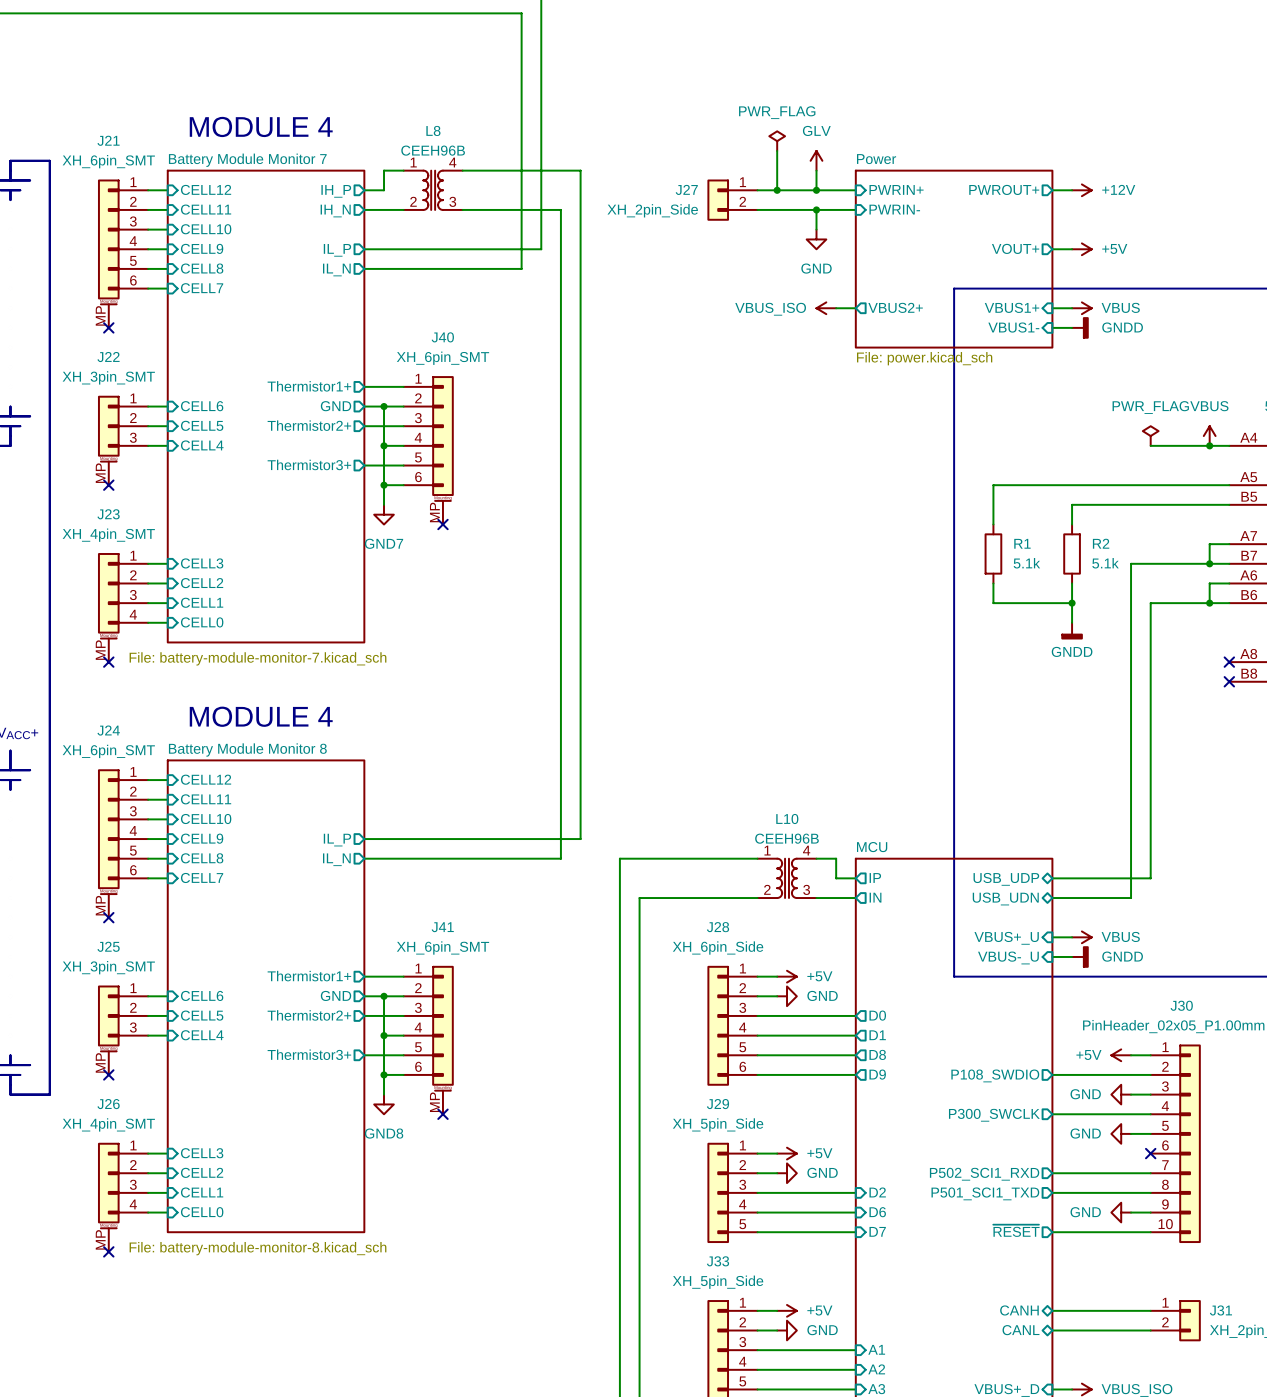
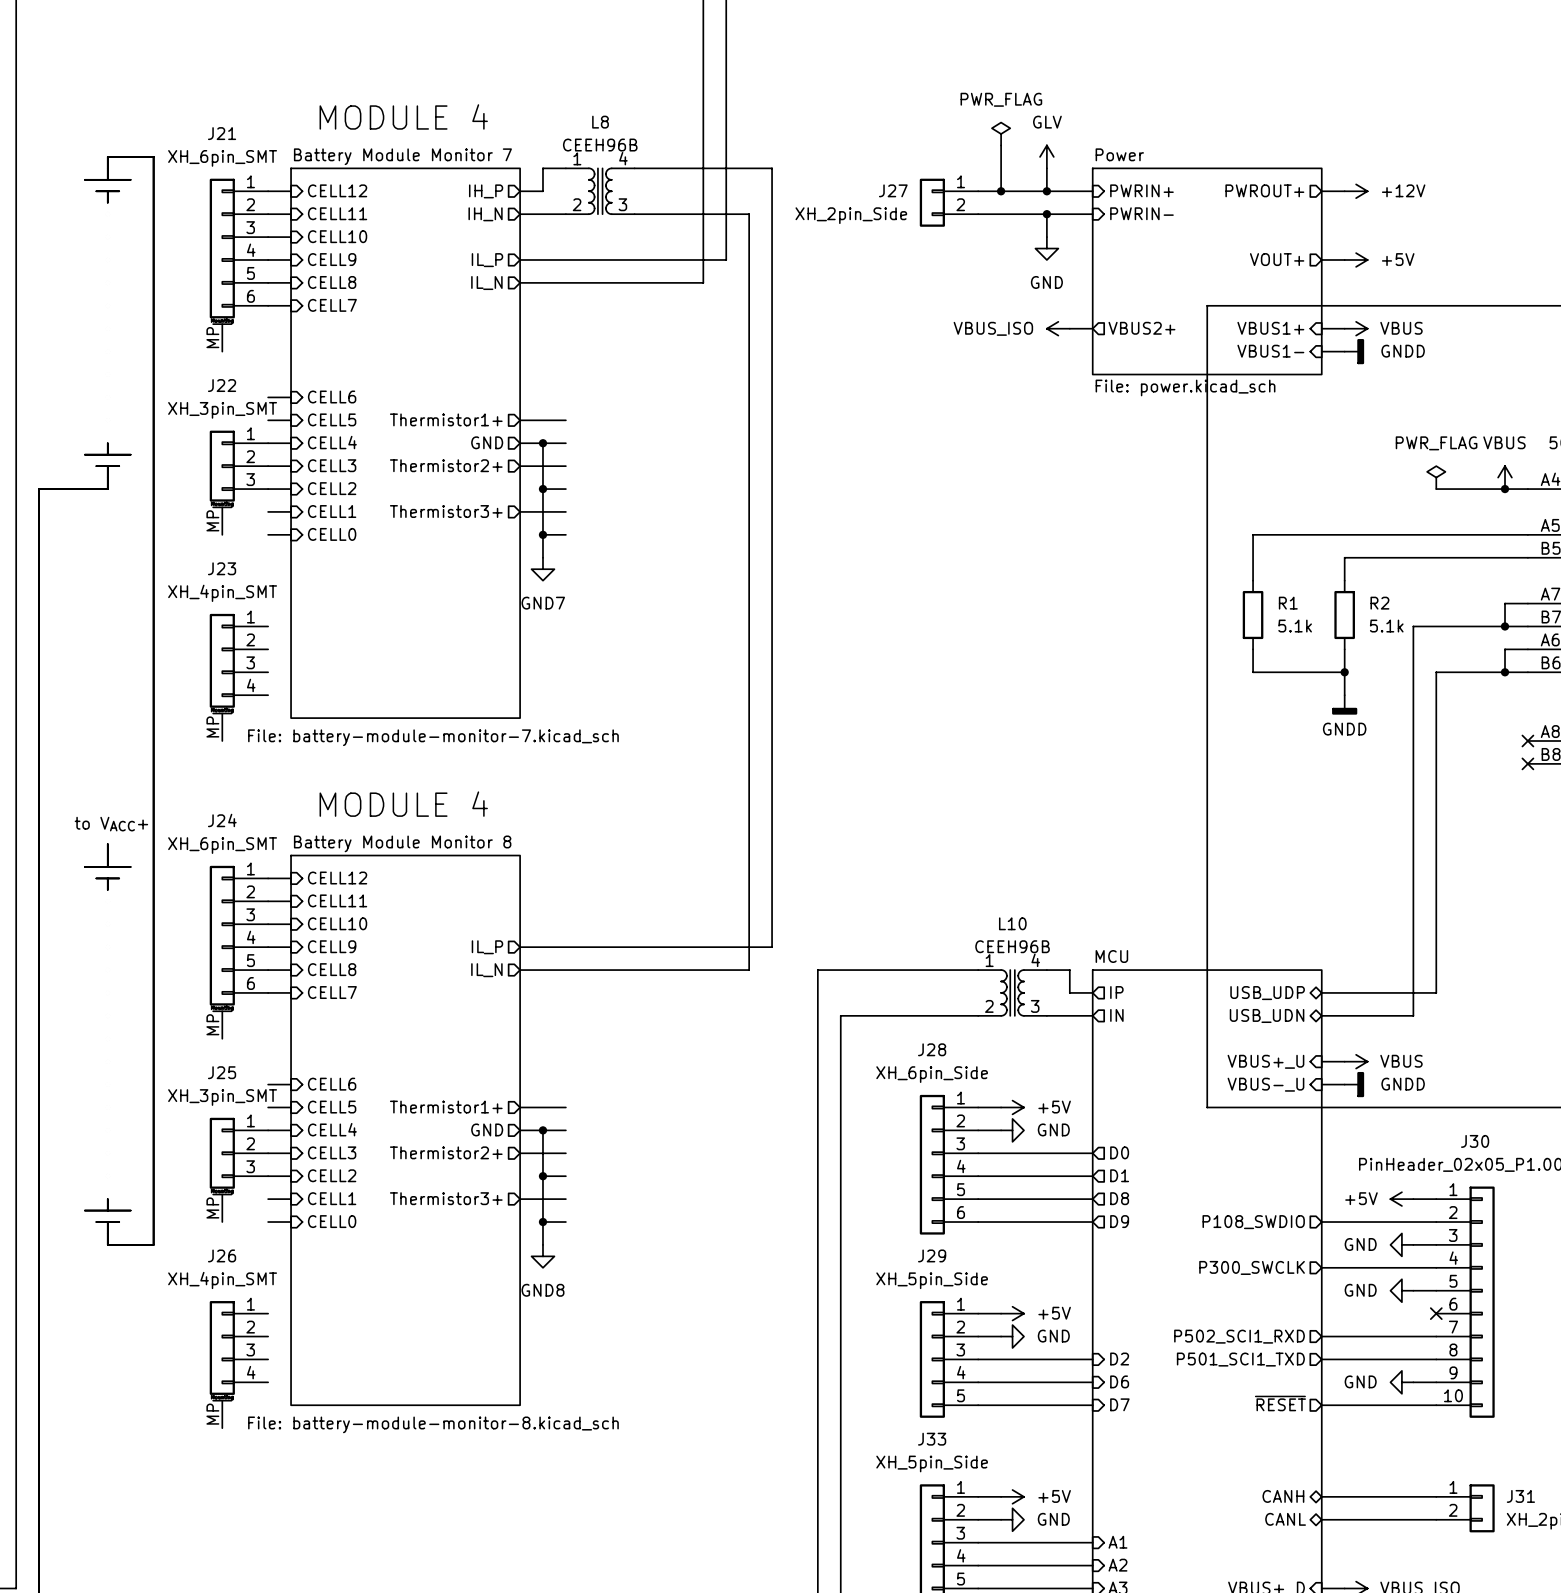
no-connect mark: (108, 327) -> none
sheet pin: none -> CELL6 (332, 396)
wire: none -> (268, 397) (291, 397)
wire: none -> (268, 420) (291, 420)
sheet pin: none -> CELL5 (332, 419)
sheet pin: CELL6 (202, 406) -> CELL4 (332, 442)
sheet pin: CELL5 (202, 425) -> CELL3 (332, 465)
sheet pin: CELL4 (202, 445) -> CELL2 (332, 488)
J40: XH_6pin_SMT (428, 450) -> none
no-connect mark: (108, 485) -> none
no-connect mark: (442, 524) -> none
wire: (148, 563) (167, 563) -> (268, 511) (291, 511)
sheet pin: CELL3 (202, 563) -> none
wire: (148, 583) (167, 583) -> (268, 534) (291, 534)
sheet pin: CELL2 (202, 583) -> none
sheet pin position: CELL1 (202, 602) -> CELL1 (332, 511)
wire: (148, 603) (167, 603) -> none
wire: (148, 622) (167, 622) -> none
sheet pin position: CELL0 (202, 622) -> CELL0 (332, 534)
no-connect mark: (108, 662) -> none
no-connect mark: (108, 917) -> none
wire: none -> (268, 1084) (291, 1084)
sheet pin: none -> CELL6 (332, 1084)
wire: none -> (268, 1107) (291, 1107)
sheet pin: none -> CELL5 (332, 1107)
sheet pin: CELL6 (202, 995) -> CELL4 (332, 1129)
sheet pin: CELL5 (202, 1015) -> CELL3 (332, 1152)
sheet pin: CELL4 (202, 1035) -> CELL2 (332, 1175)
J41: XH_6pin_SMT (428, 1040) -> none
no-connect mark: (108, 1074) -> none
no-connect mark: (442, 1114) -> none
wire: (148, 1153) (167, 1153) -> (268, 1199) (291, 1199)
sheet pin: CELL3 (202, 1153) -> none
sheet pin: CELL2 (202, 1172) -> none
wire: (148, 1173) (167, 1173) -> (268, 1222) (291, 1222)
wire: (148, 1192) (167, 1192) -> none
sheet pin position: CELL1 (202, 1192) -> CELL1 (332, 1198)
wire: (148, 1212) (167, 1212) -> none
sheet pin position: CELL0 (202, 1212) -> CELL0 (332, 1221)
no-connect mark: (108, 1251) -> none

